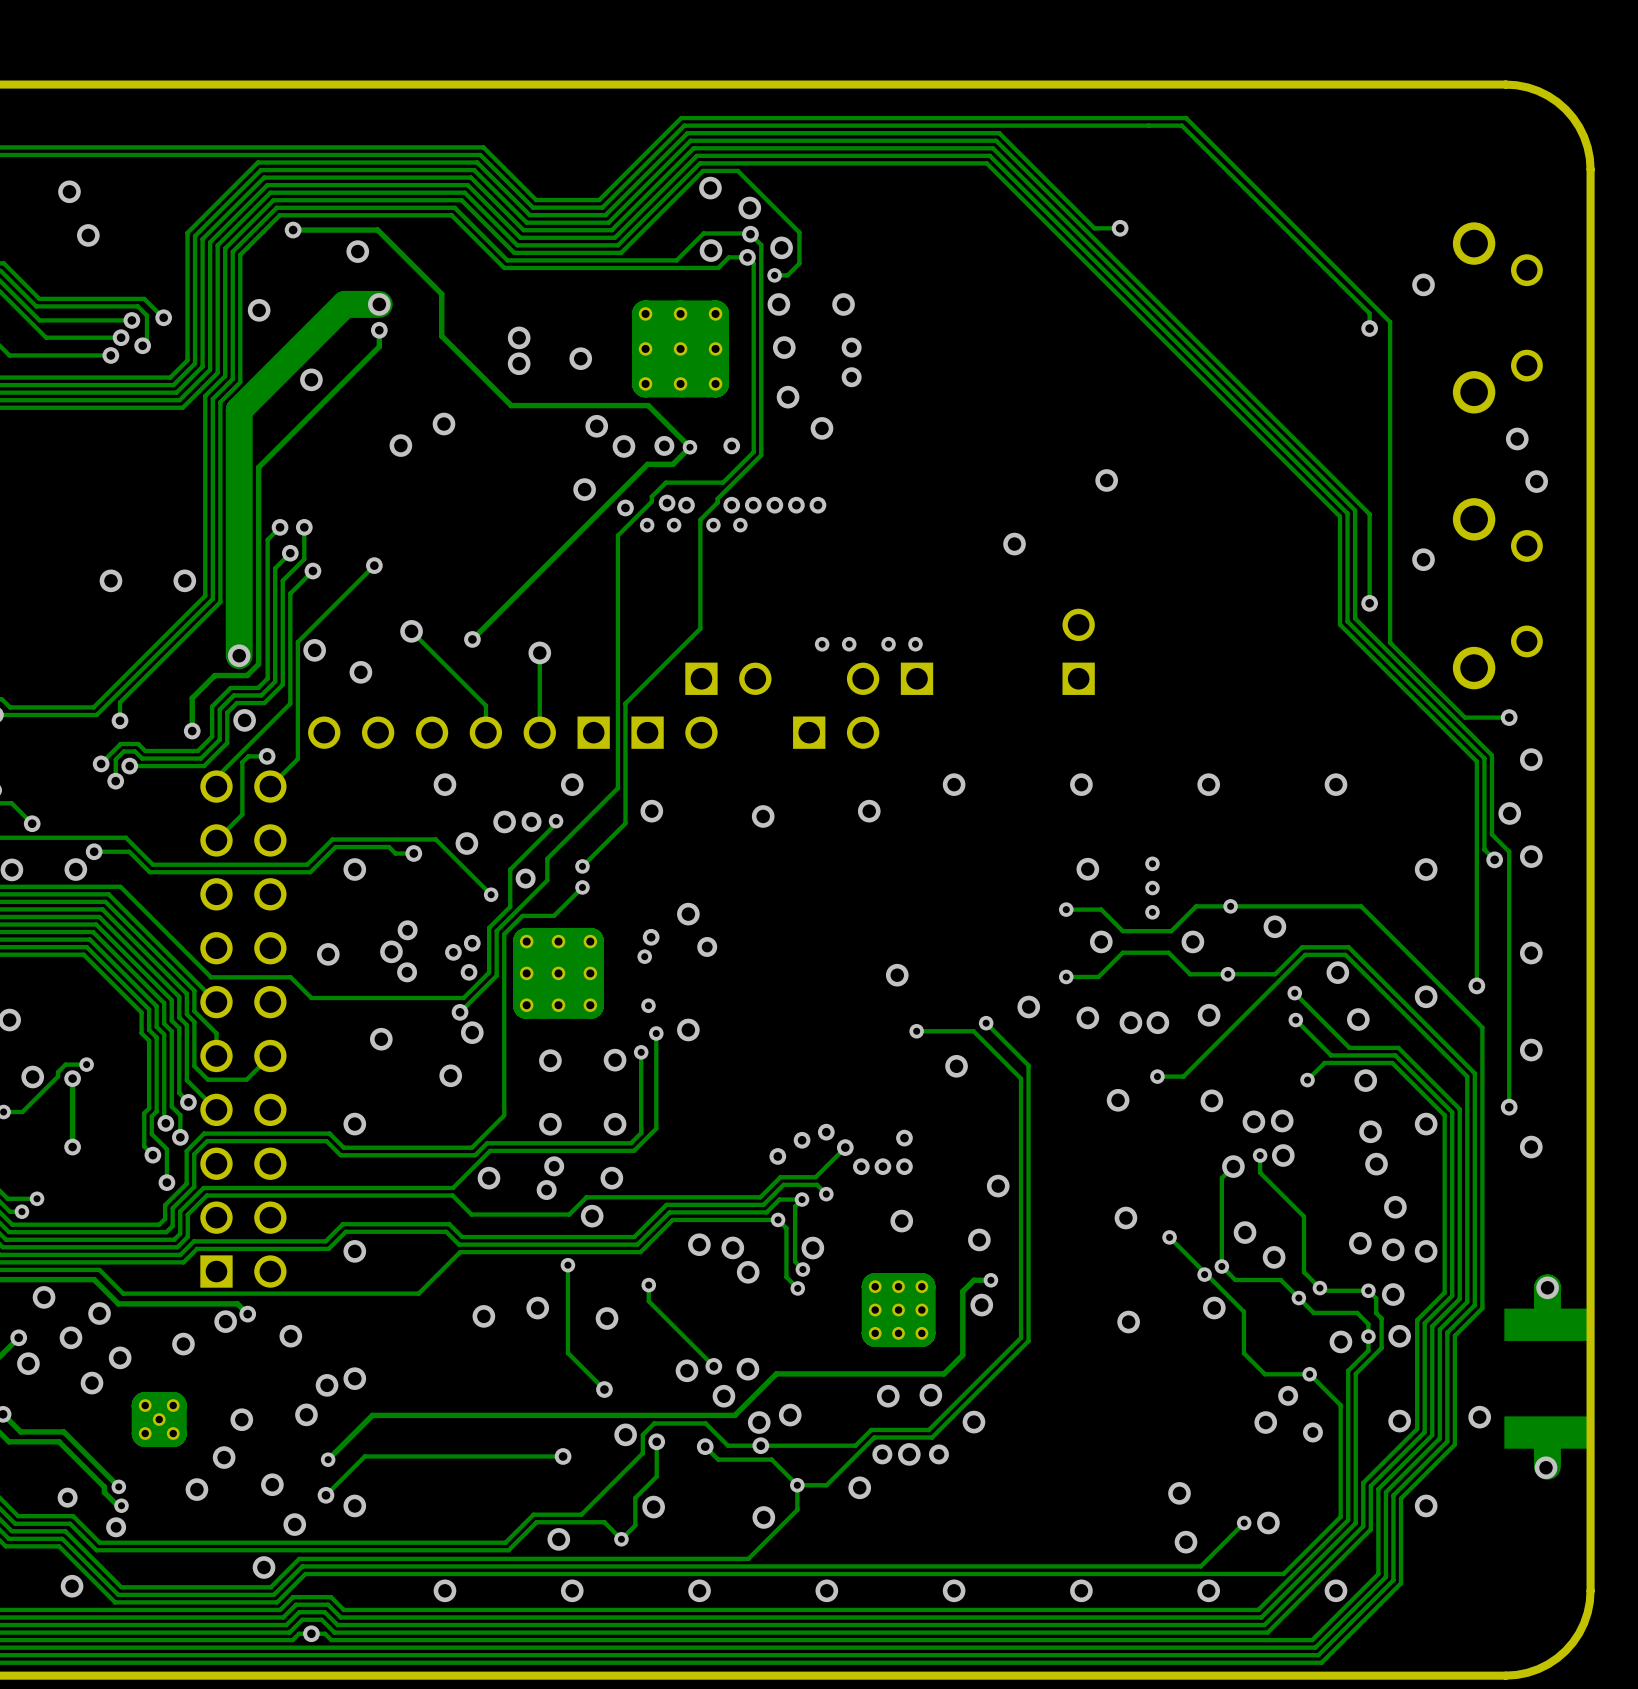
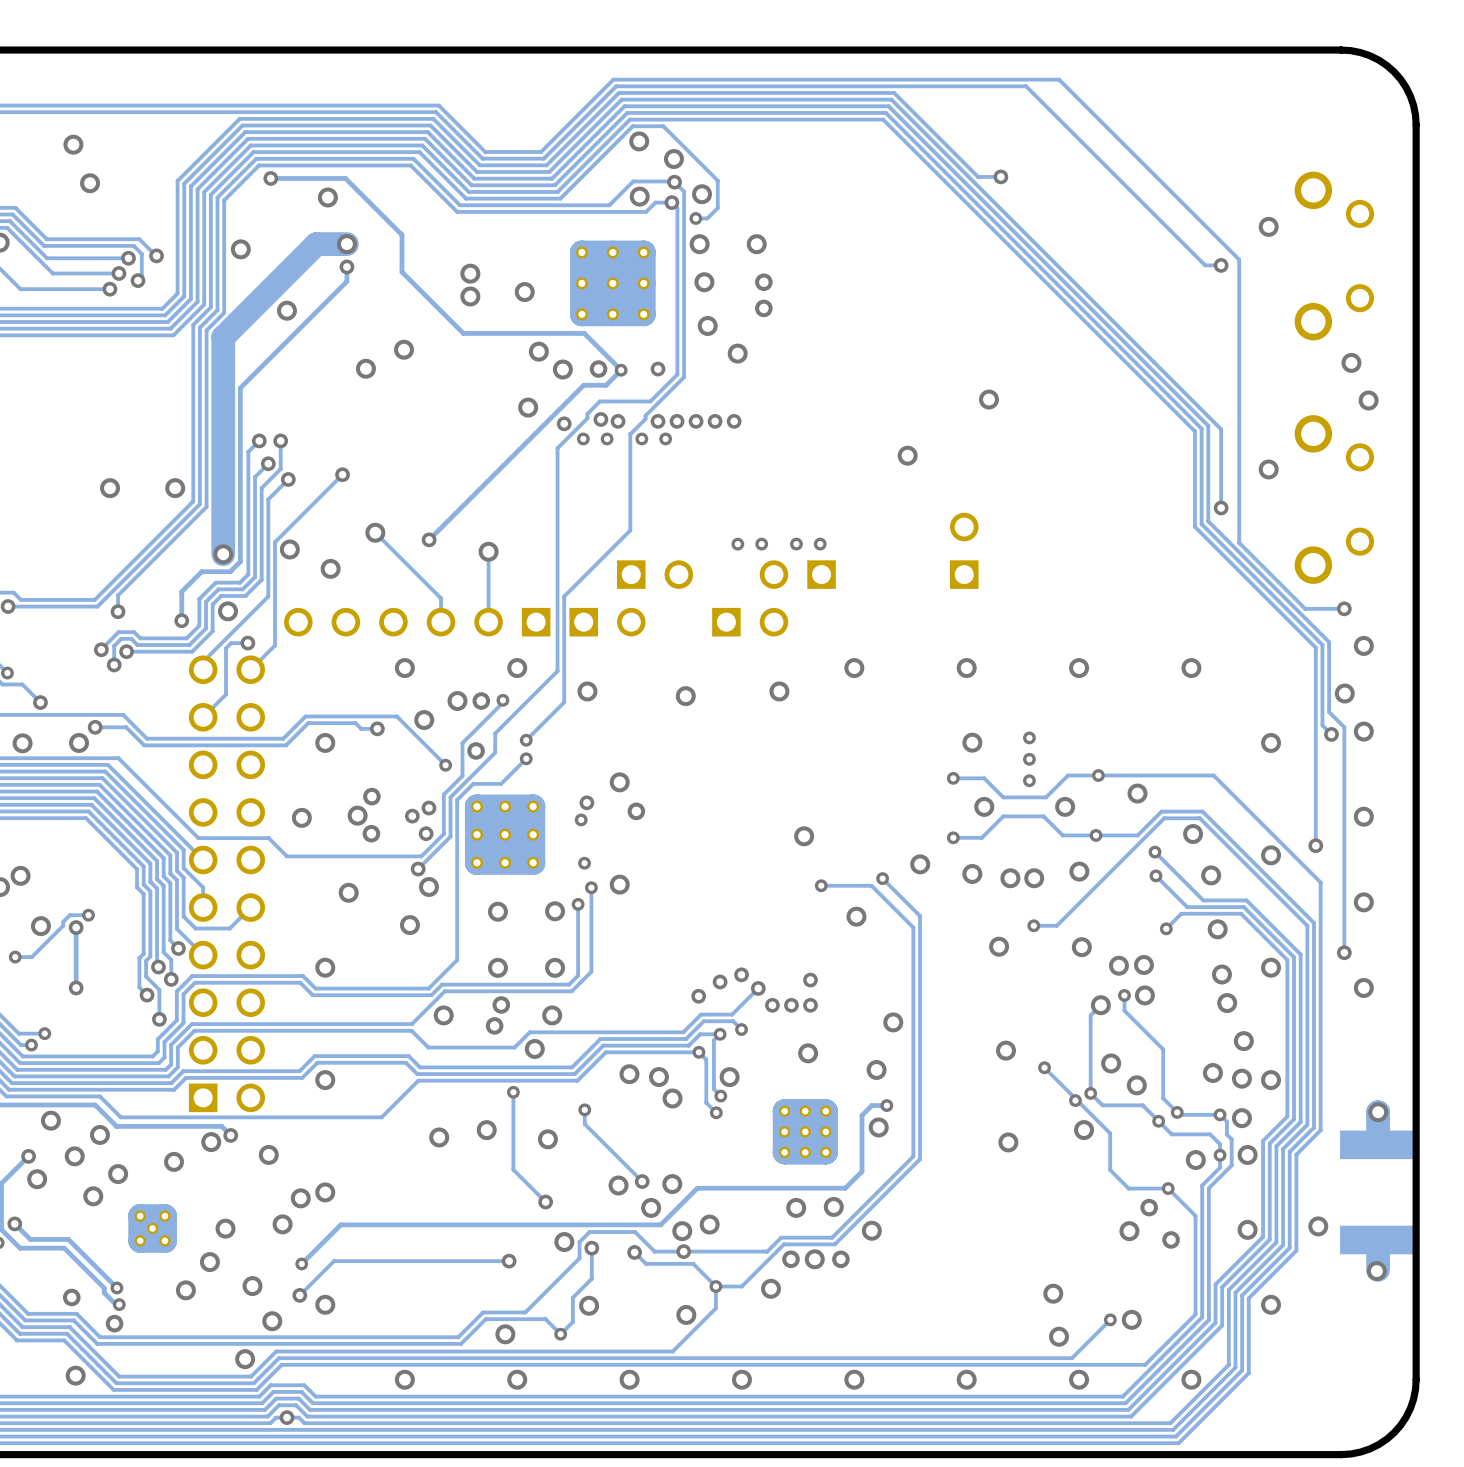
track: (1149, 125) (1181, 125) (1369, 313) (1369, 328) -> (1026, 86) (1205, 265) (1221, 265)

